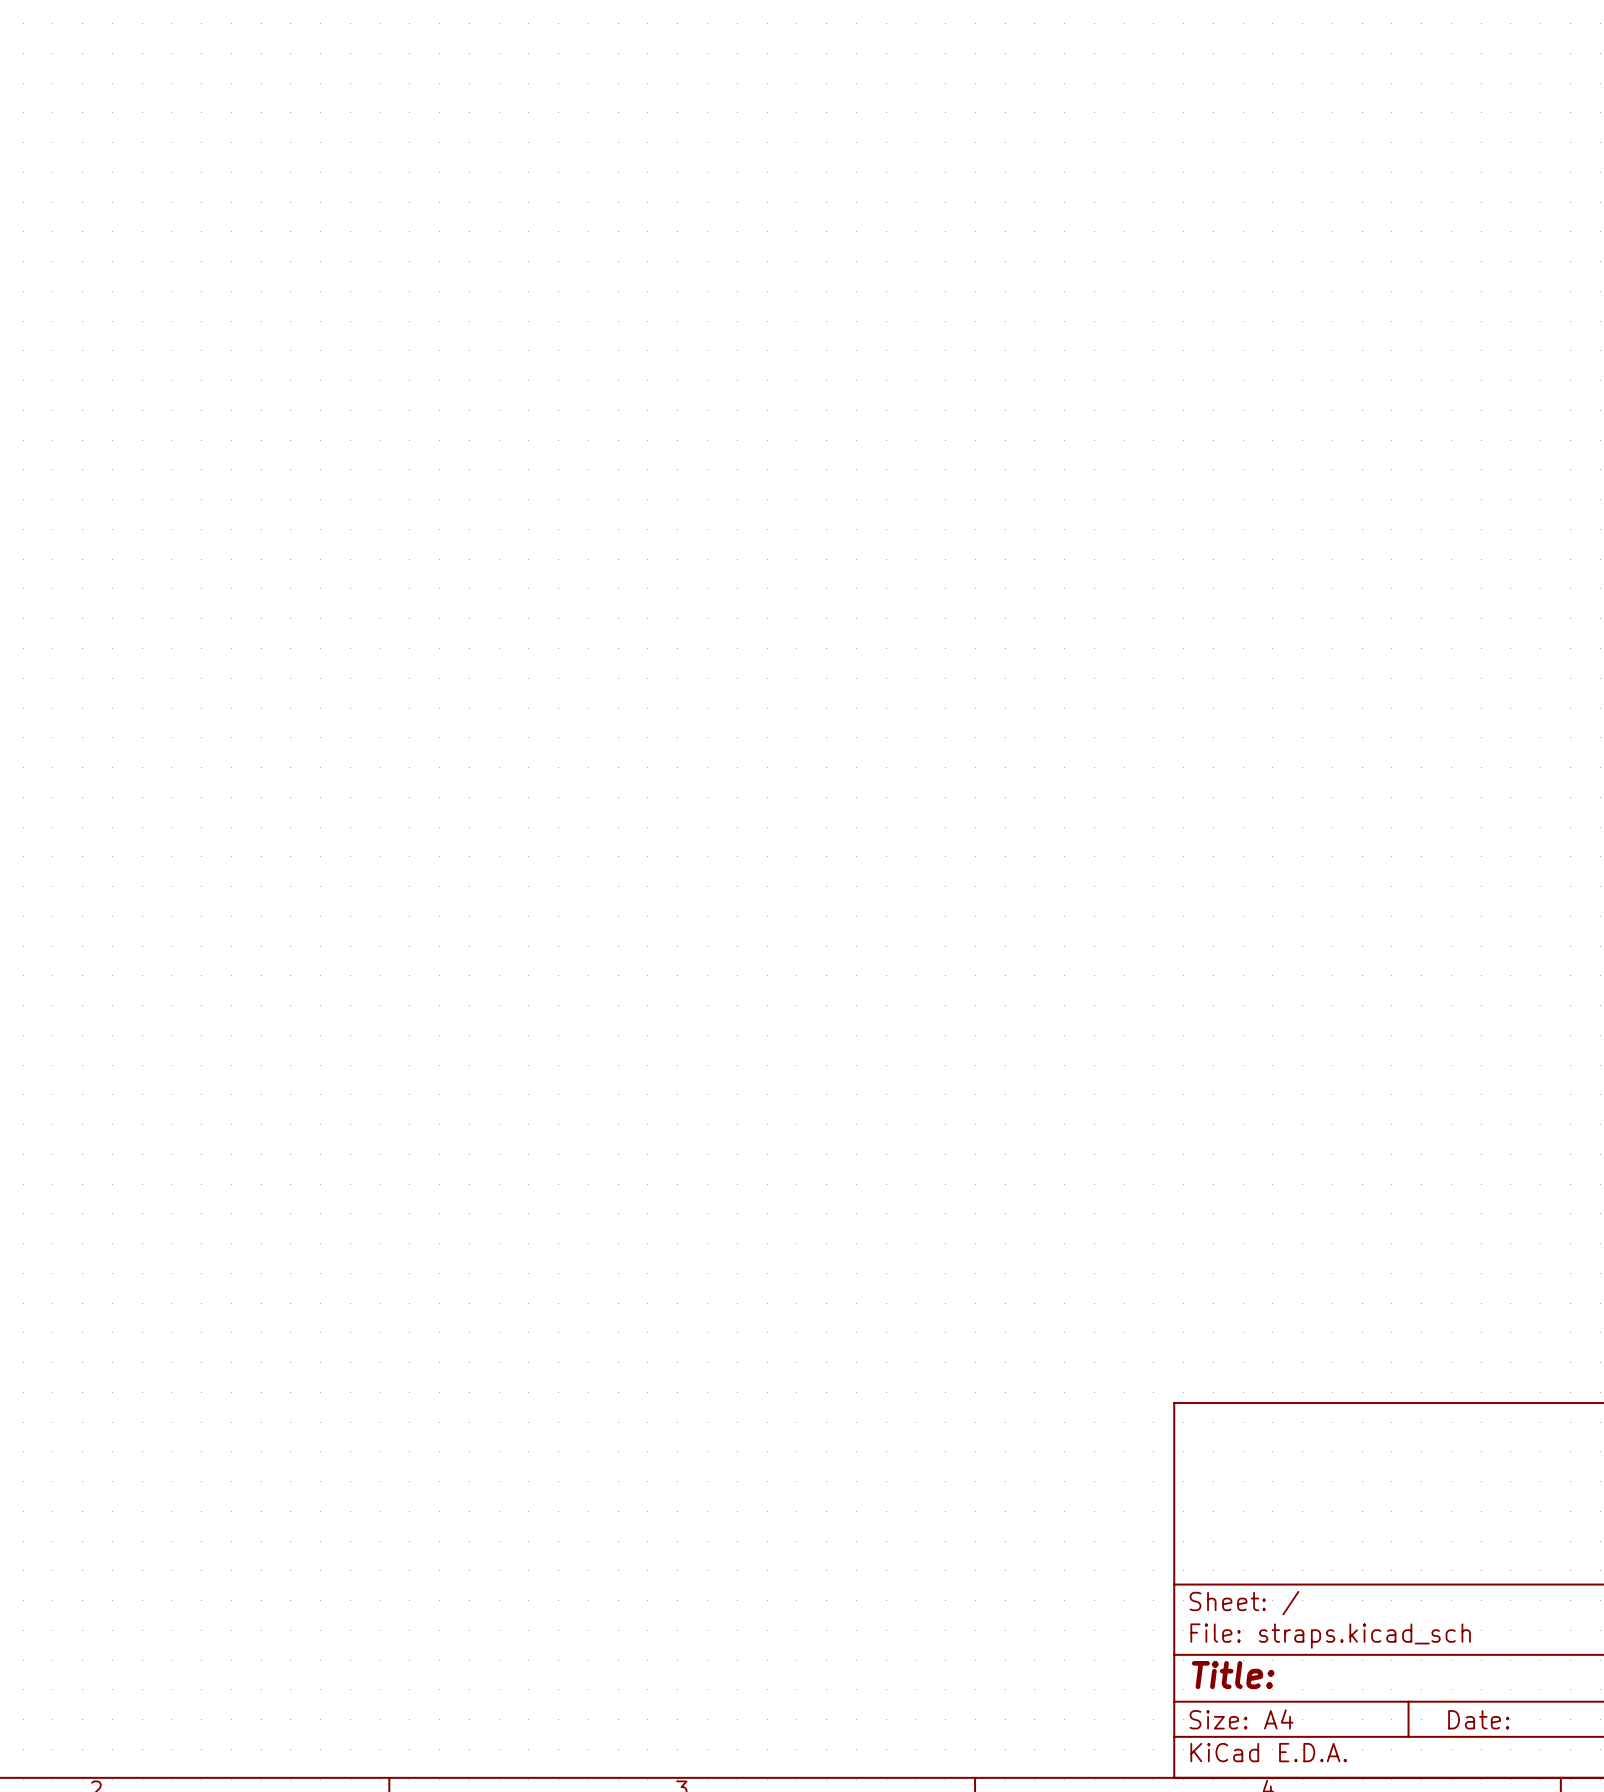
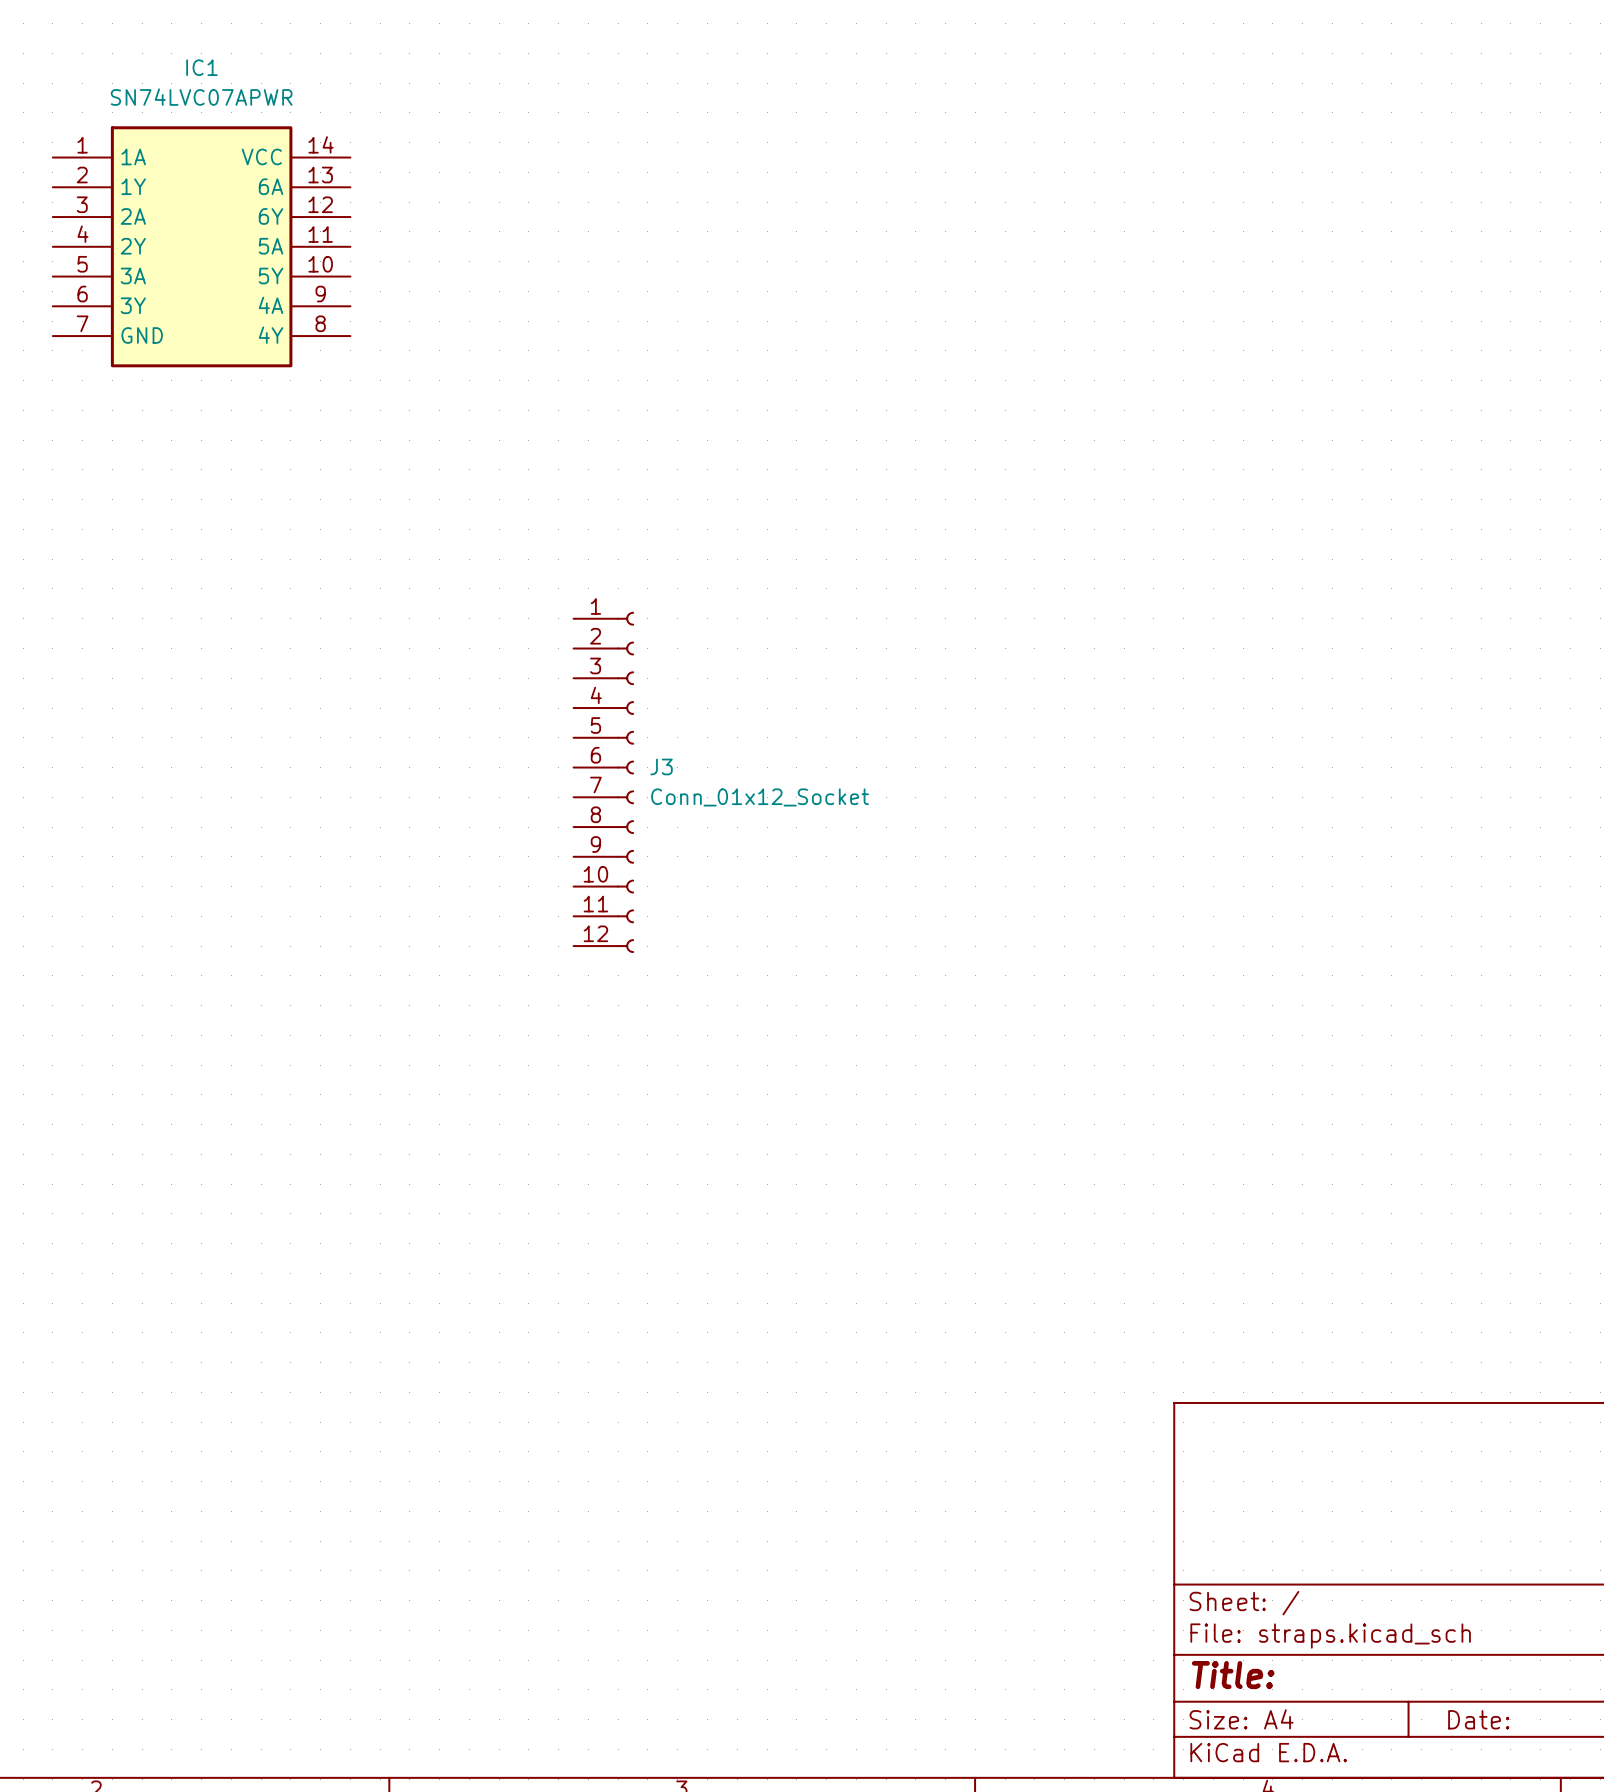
IC1: none -> SN74LVC07APWR (201, 246)
J3: none -> Conn_01x12_Socket (603, 782)

